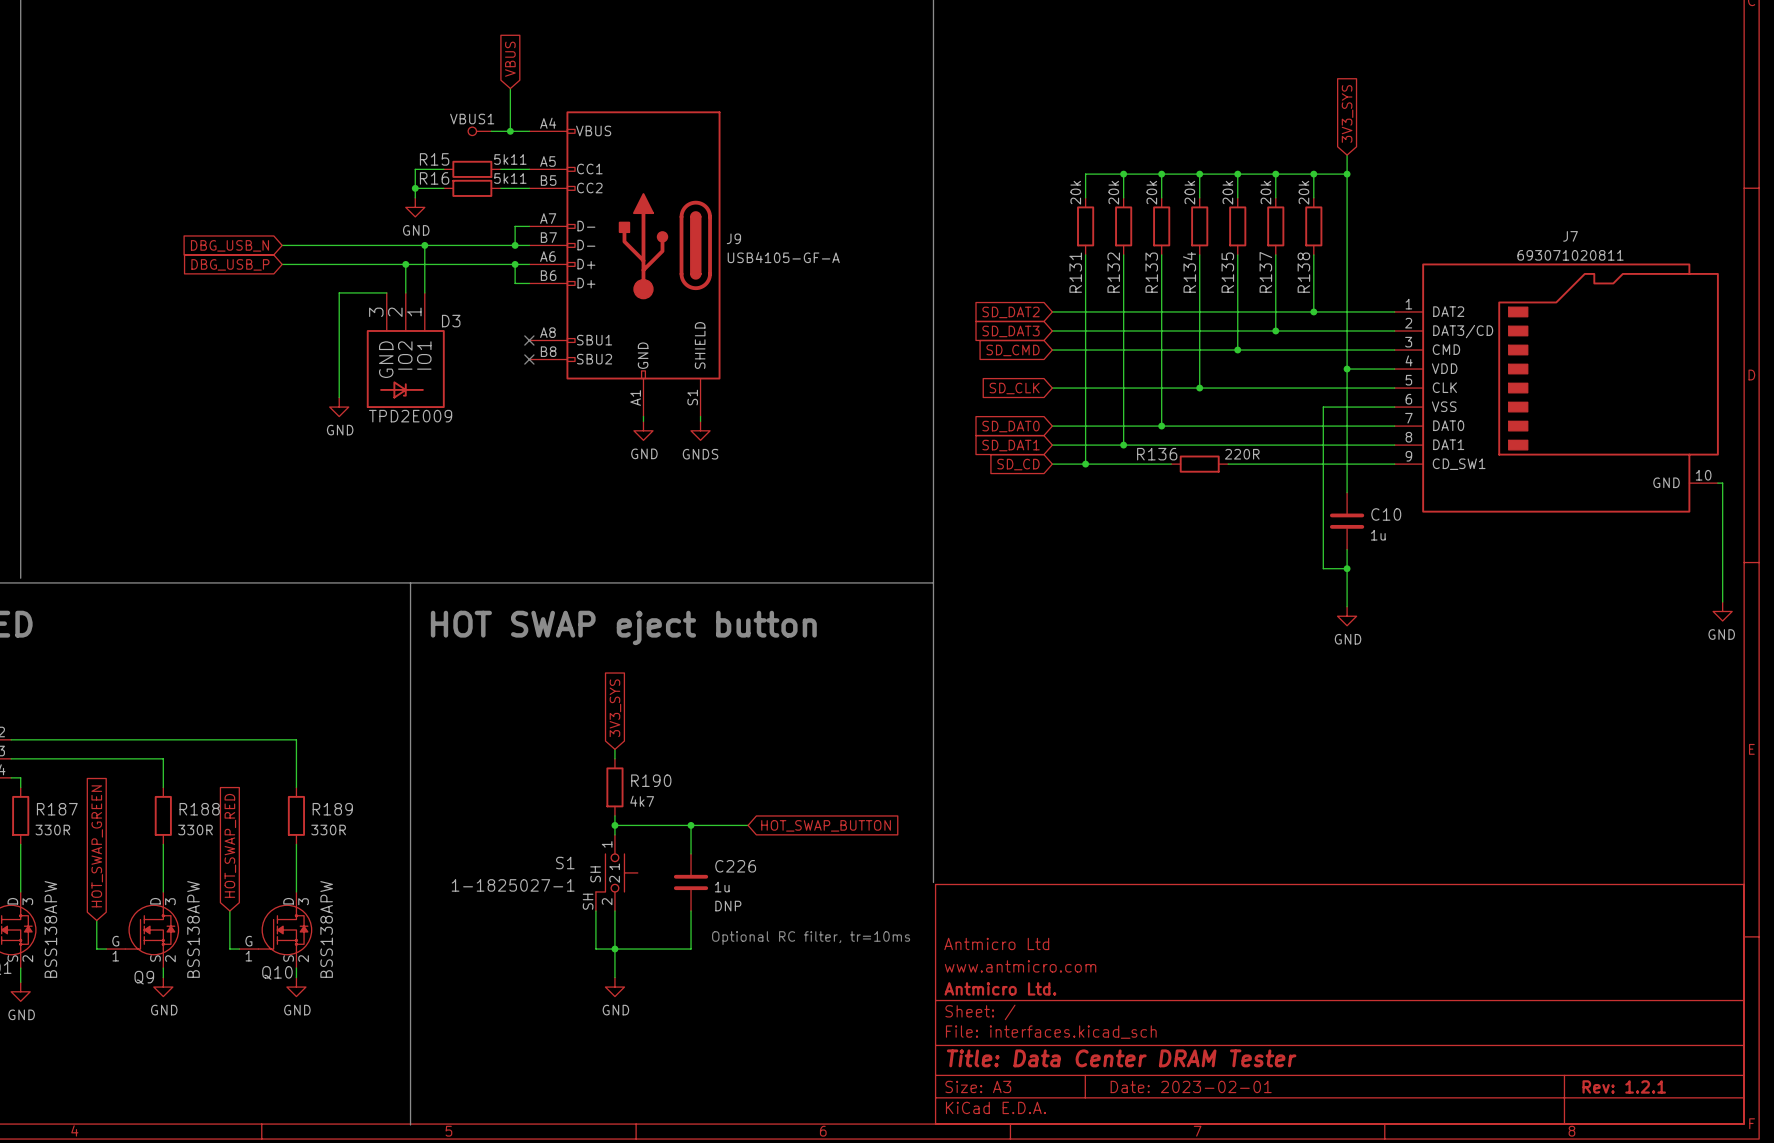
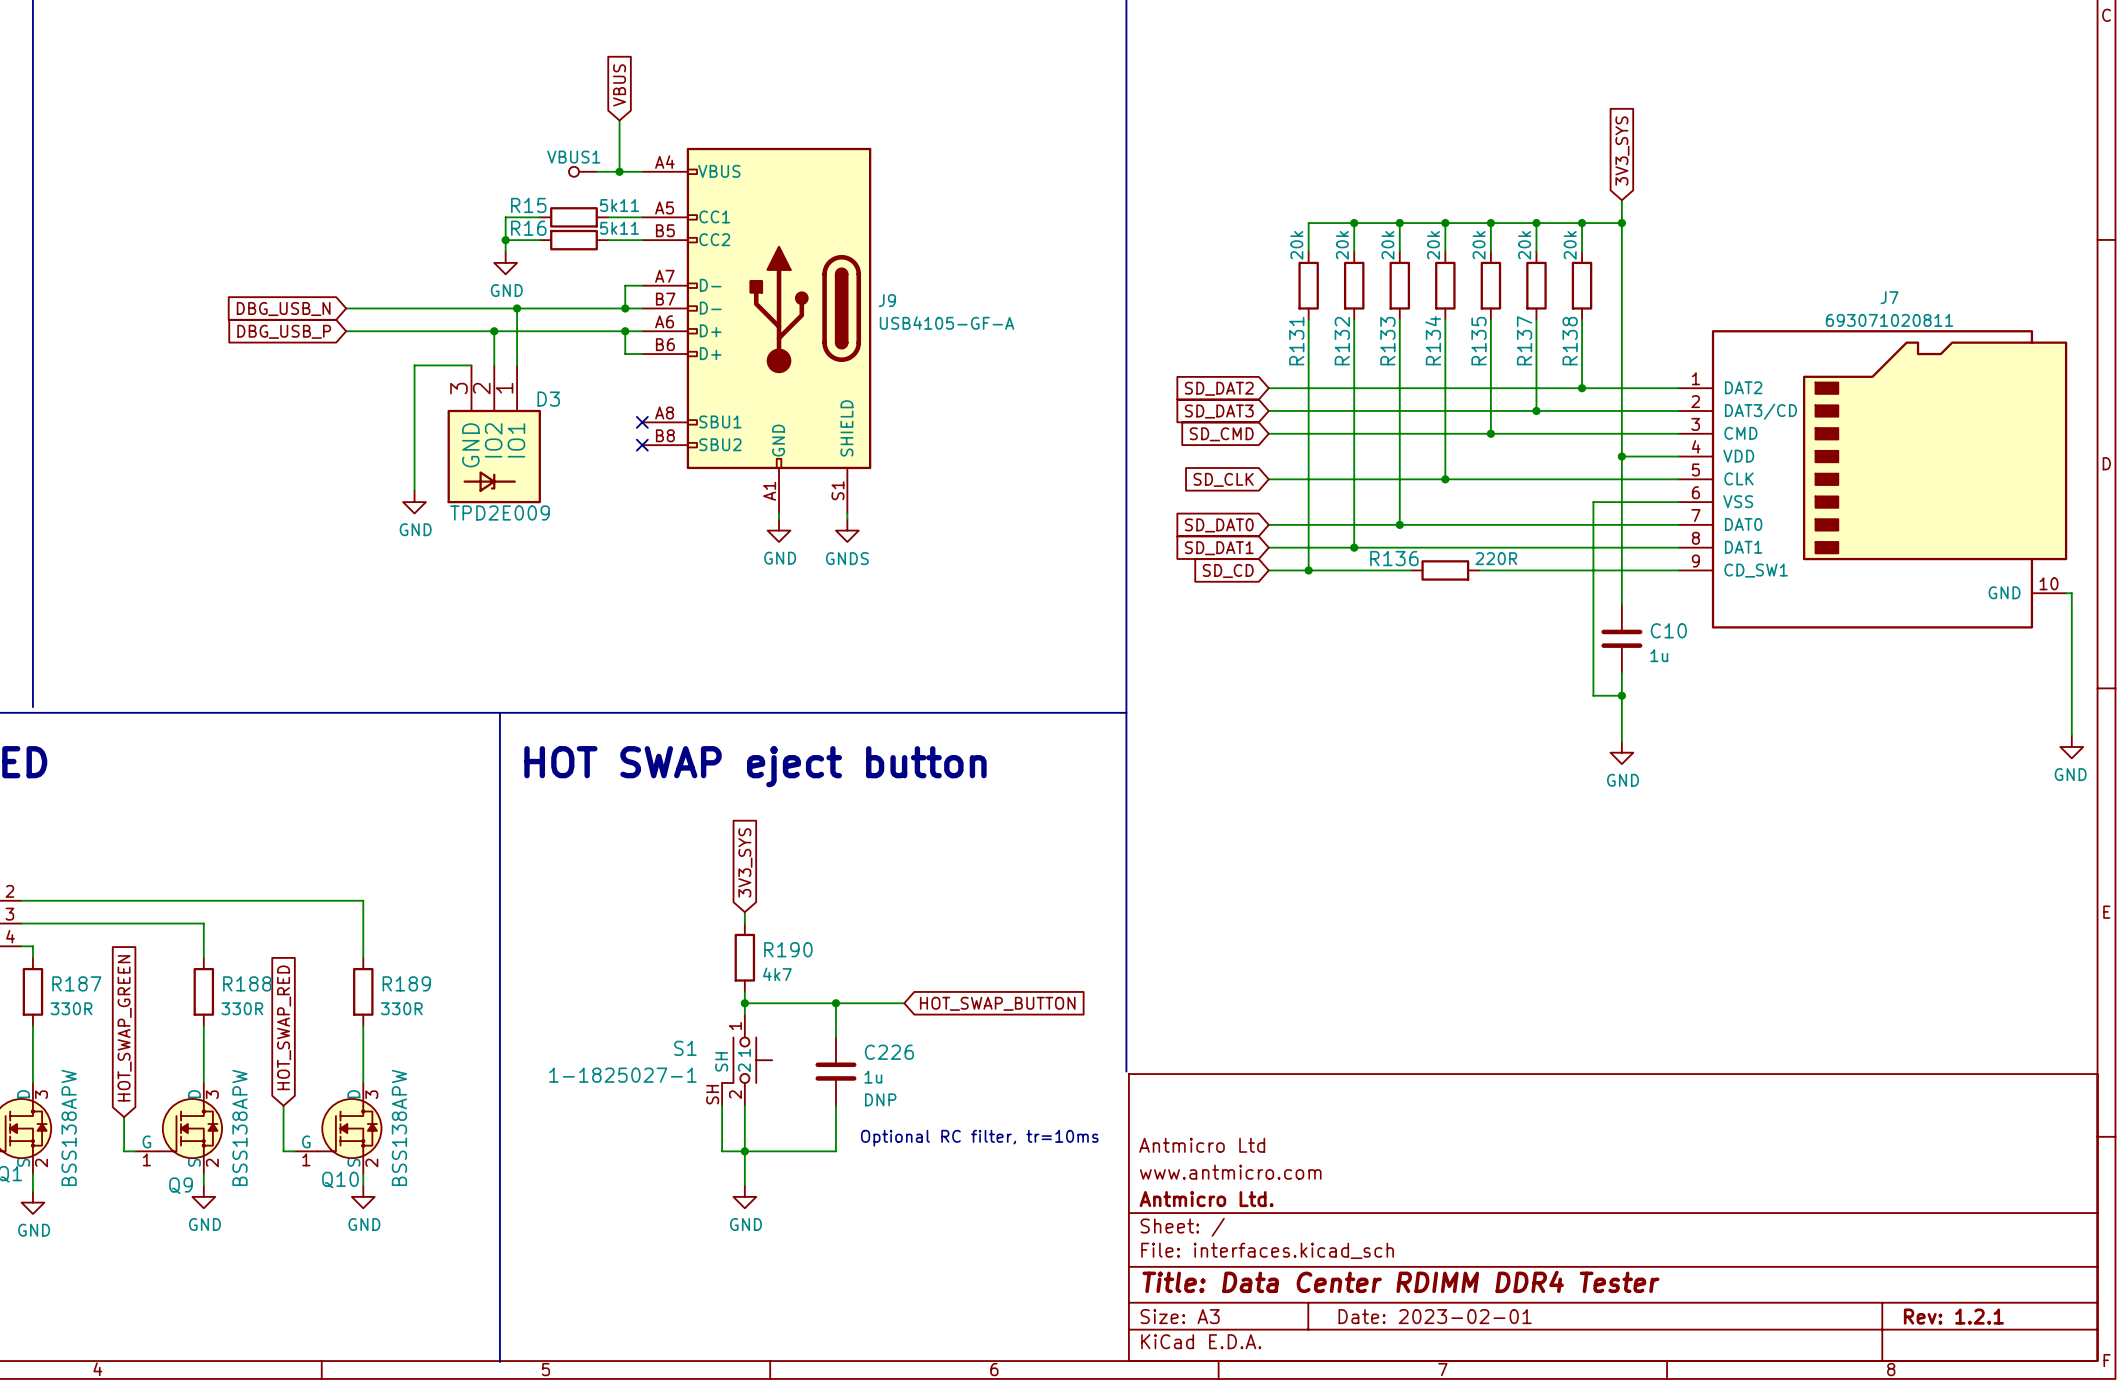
title block: Title: Data Center DRAM Tester (1121, 1058) -> Title: Data Center RDIMM DDR4 Tester (1400, 1281)

